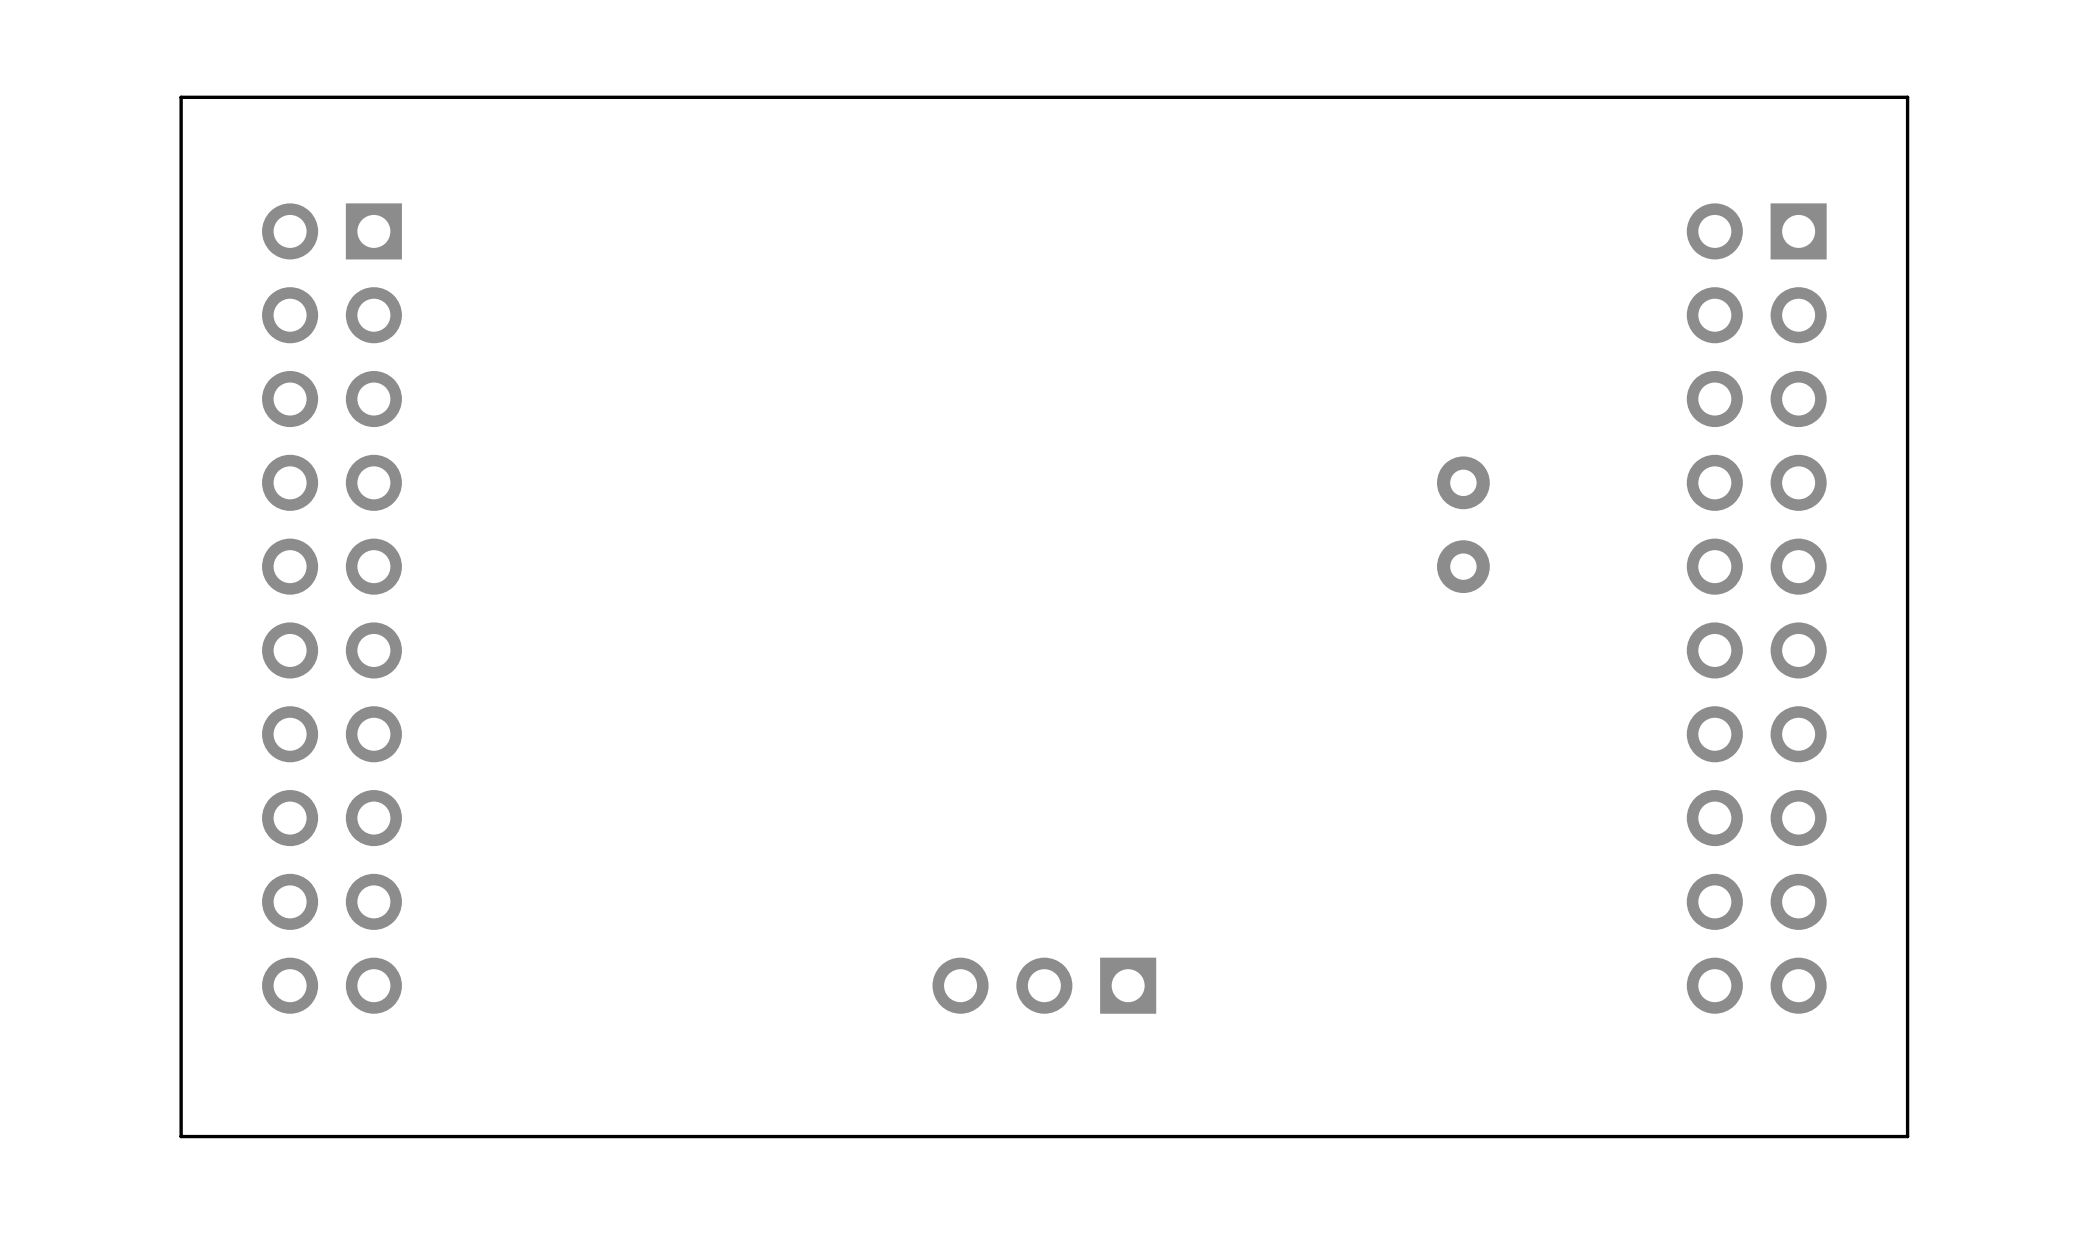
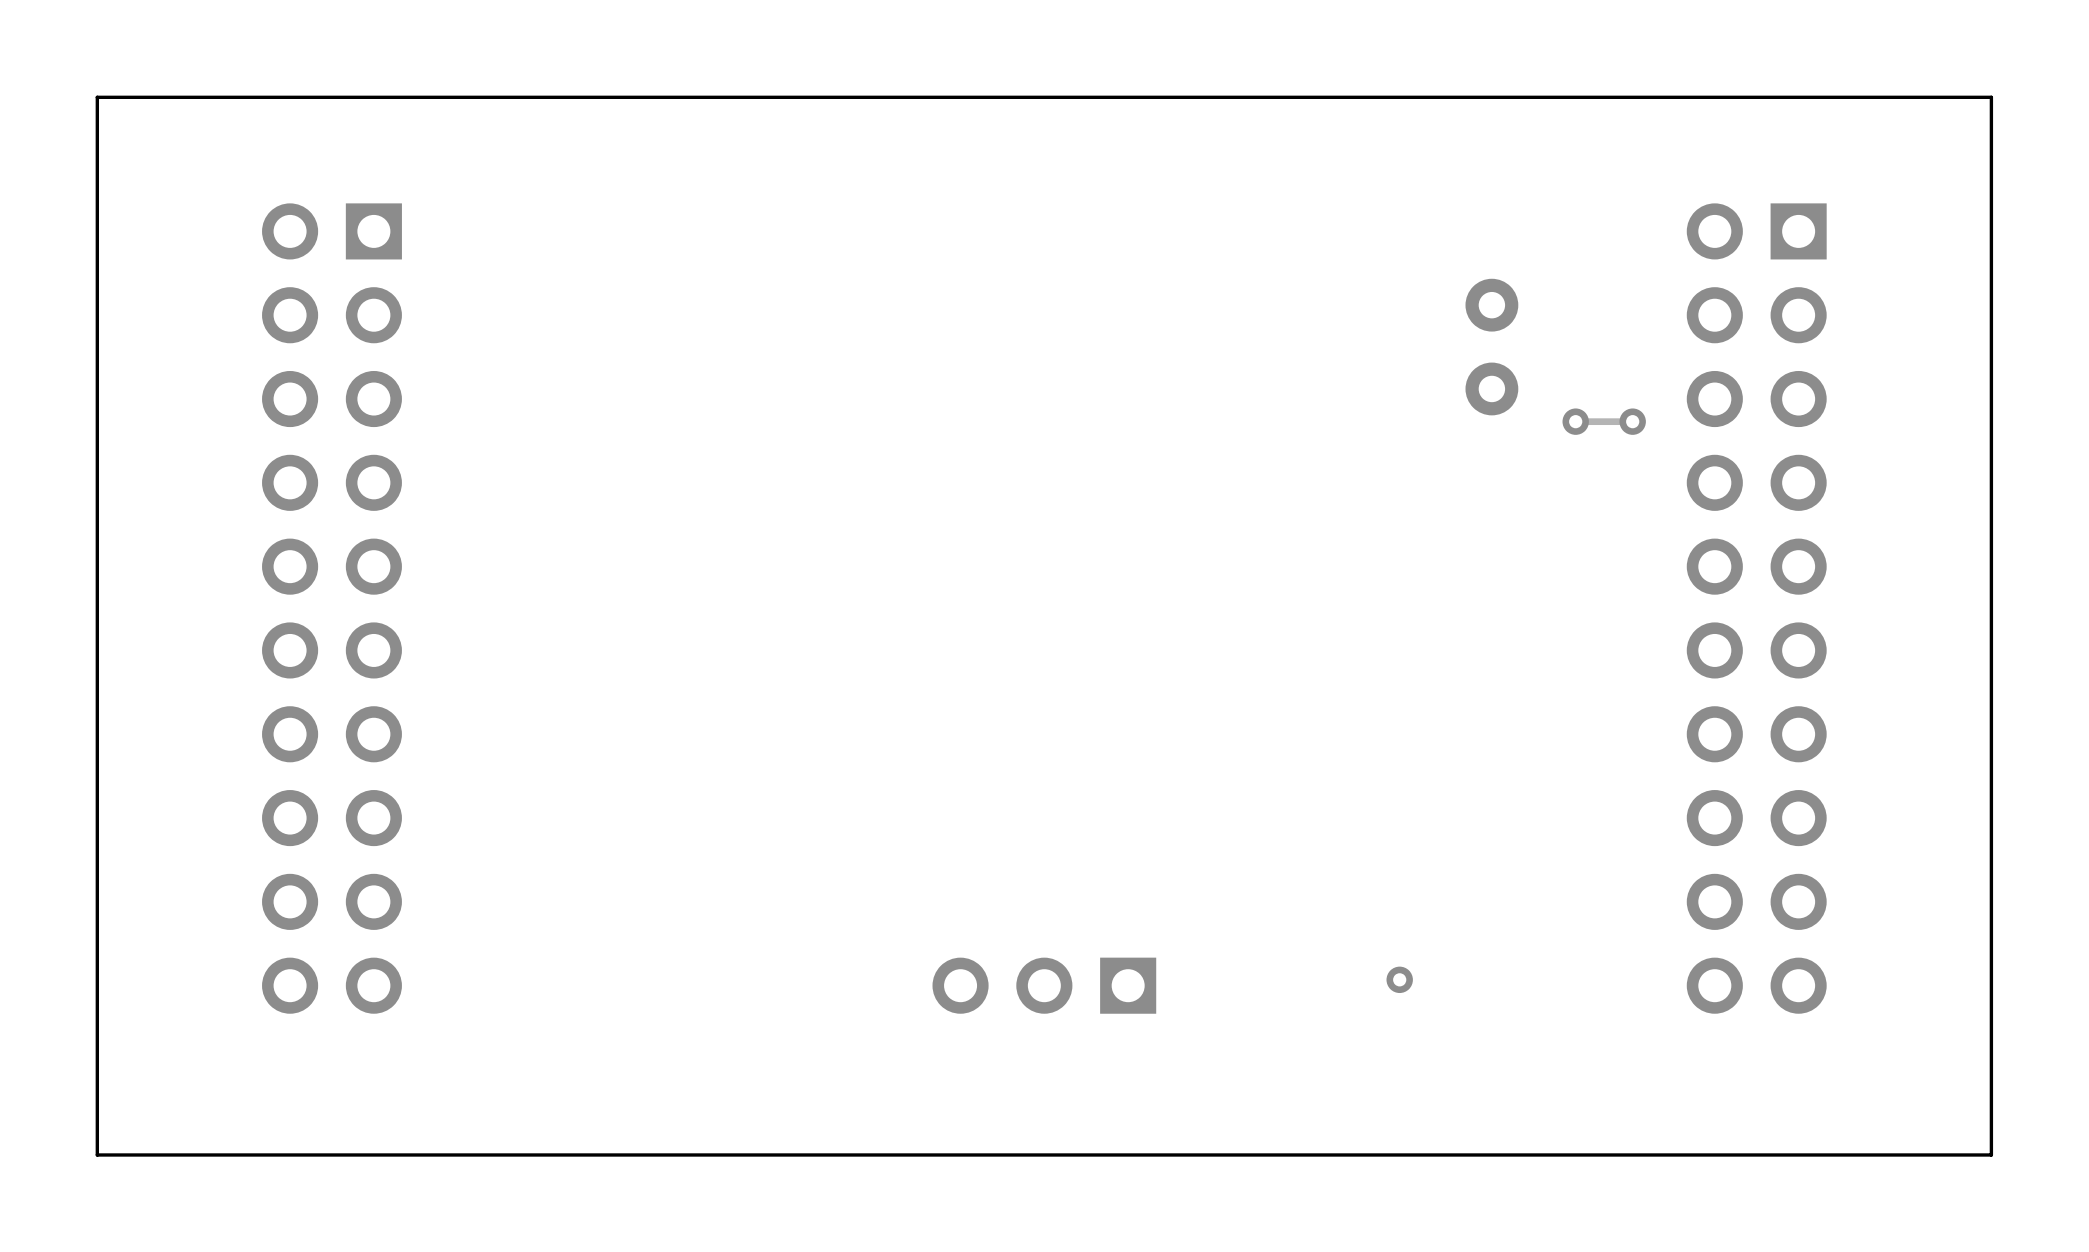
board edge: (1907, 97) (1907, 1136) (181, 1136) (181, 97) -> (1907, 97) (1991, 97) (1991, 1154) (97, 1154) (97, 97) (181, 97)
via: none -> (1575, 421)
track: none -> (1632, 421) (1575, 421)
via: none -> (1632, 421)
part position: (1463, 524) -> (1491, 347)
via: none -> (1399, 979)

